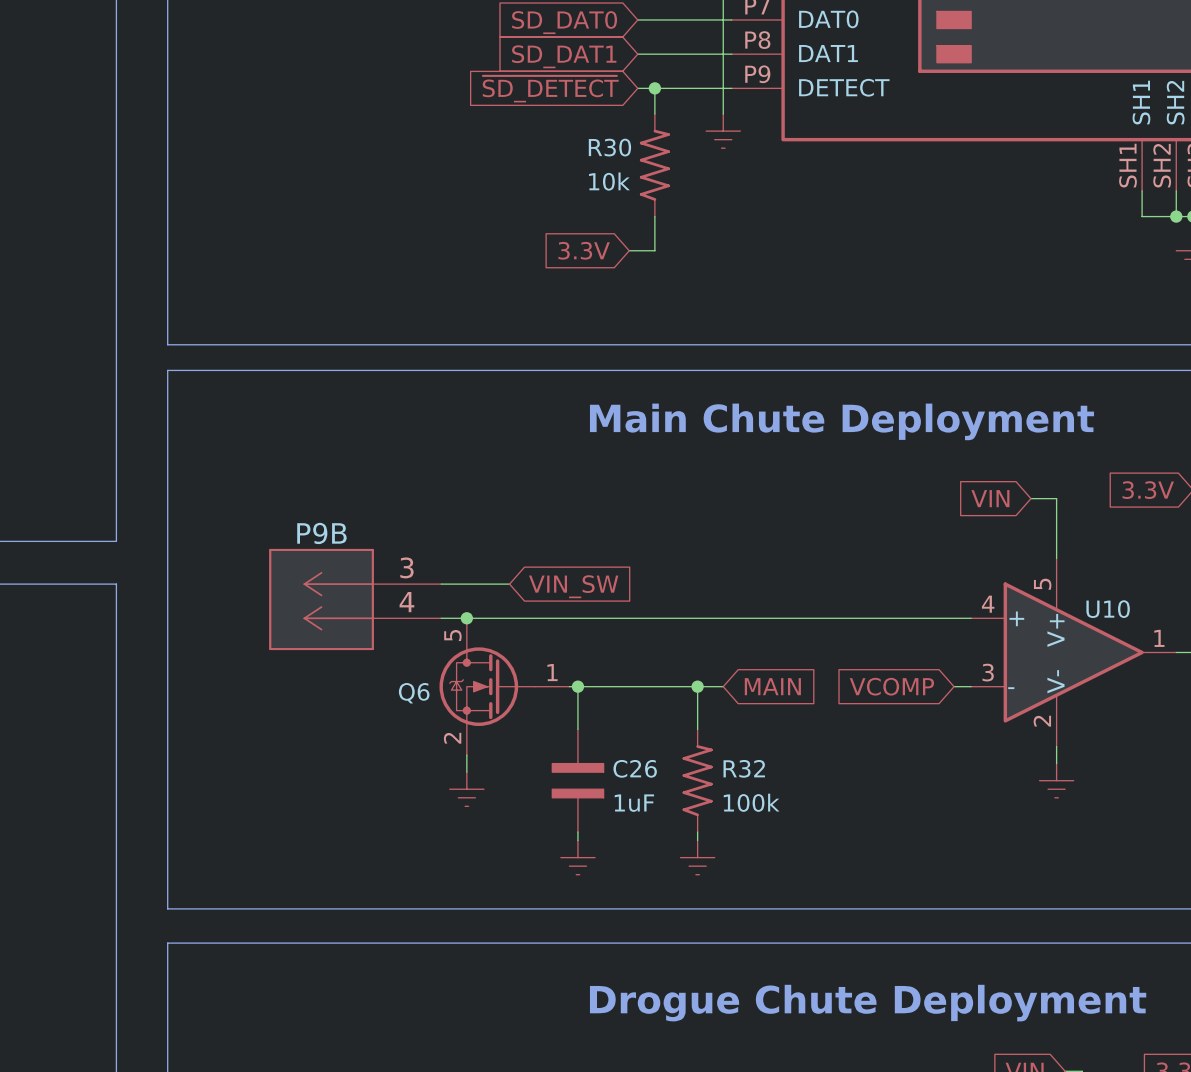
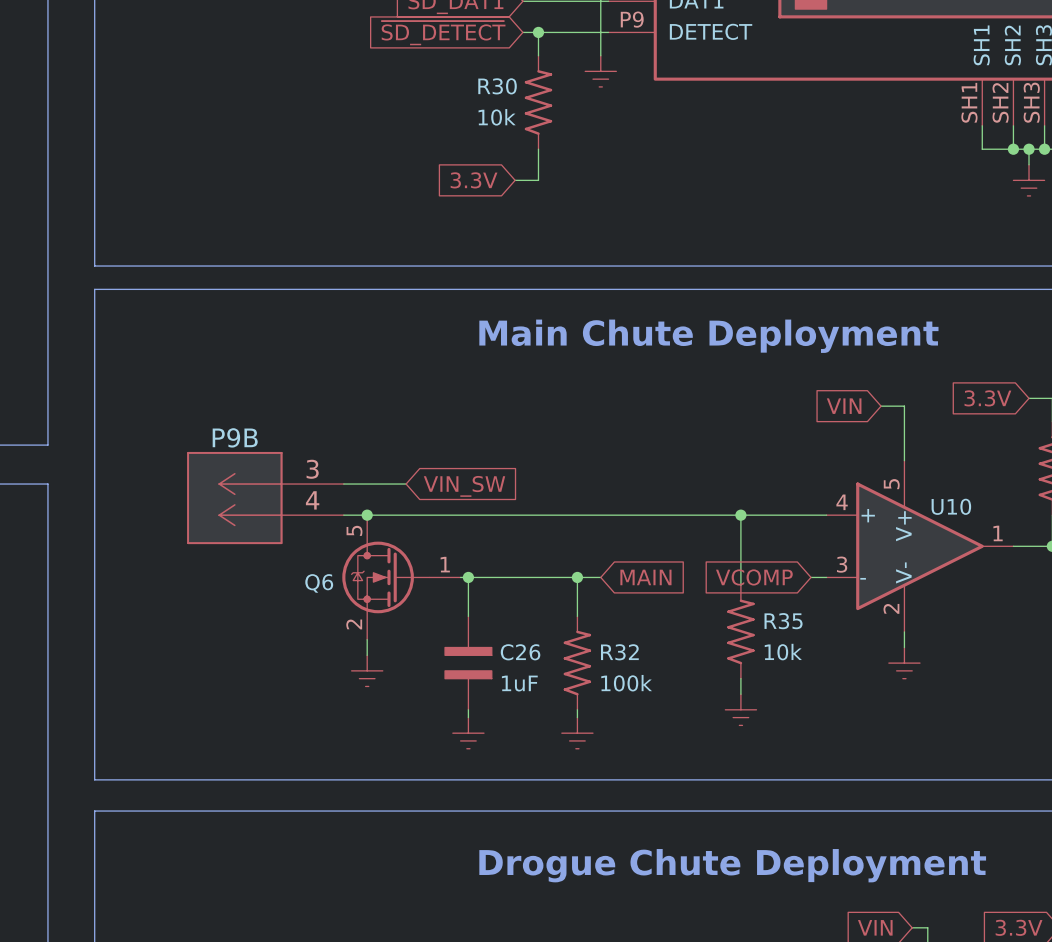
wire: none -> (740, 515) (740, 585)
junction: none -> (740, 515)
R35: none -> 10k (740, 631)
wire: none -> (740, 678) (740, 694)
power symbol: none -> (740, 709)

